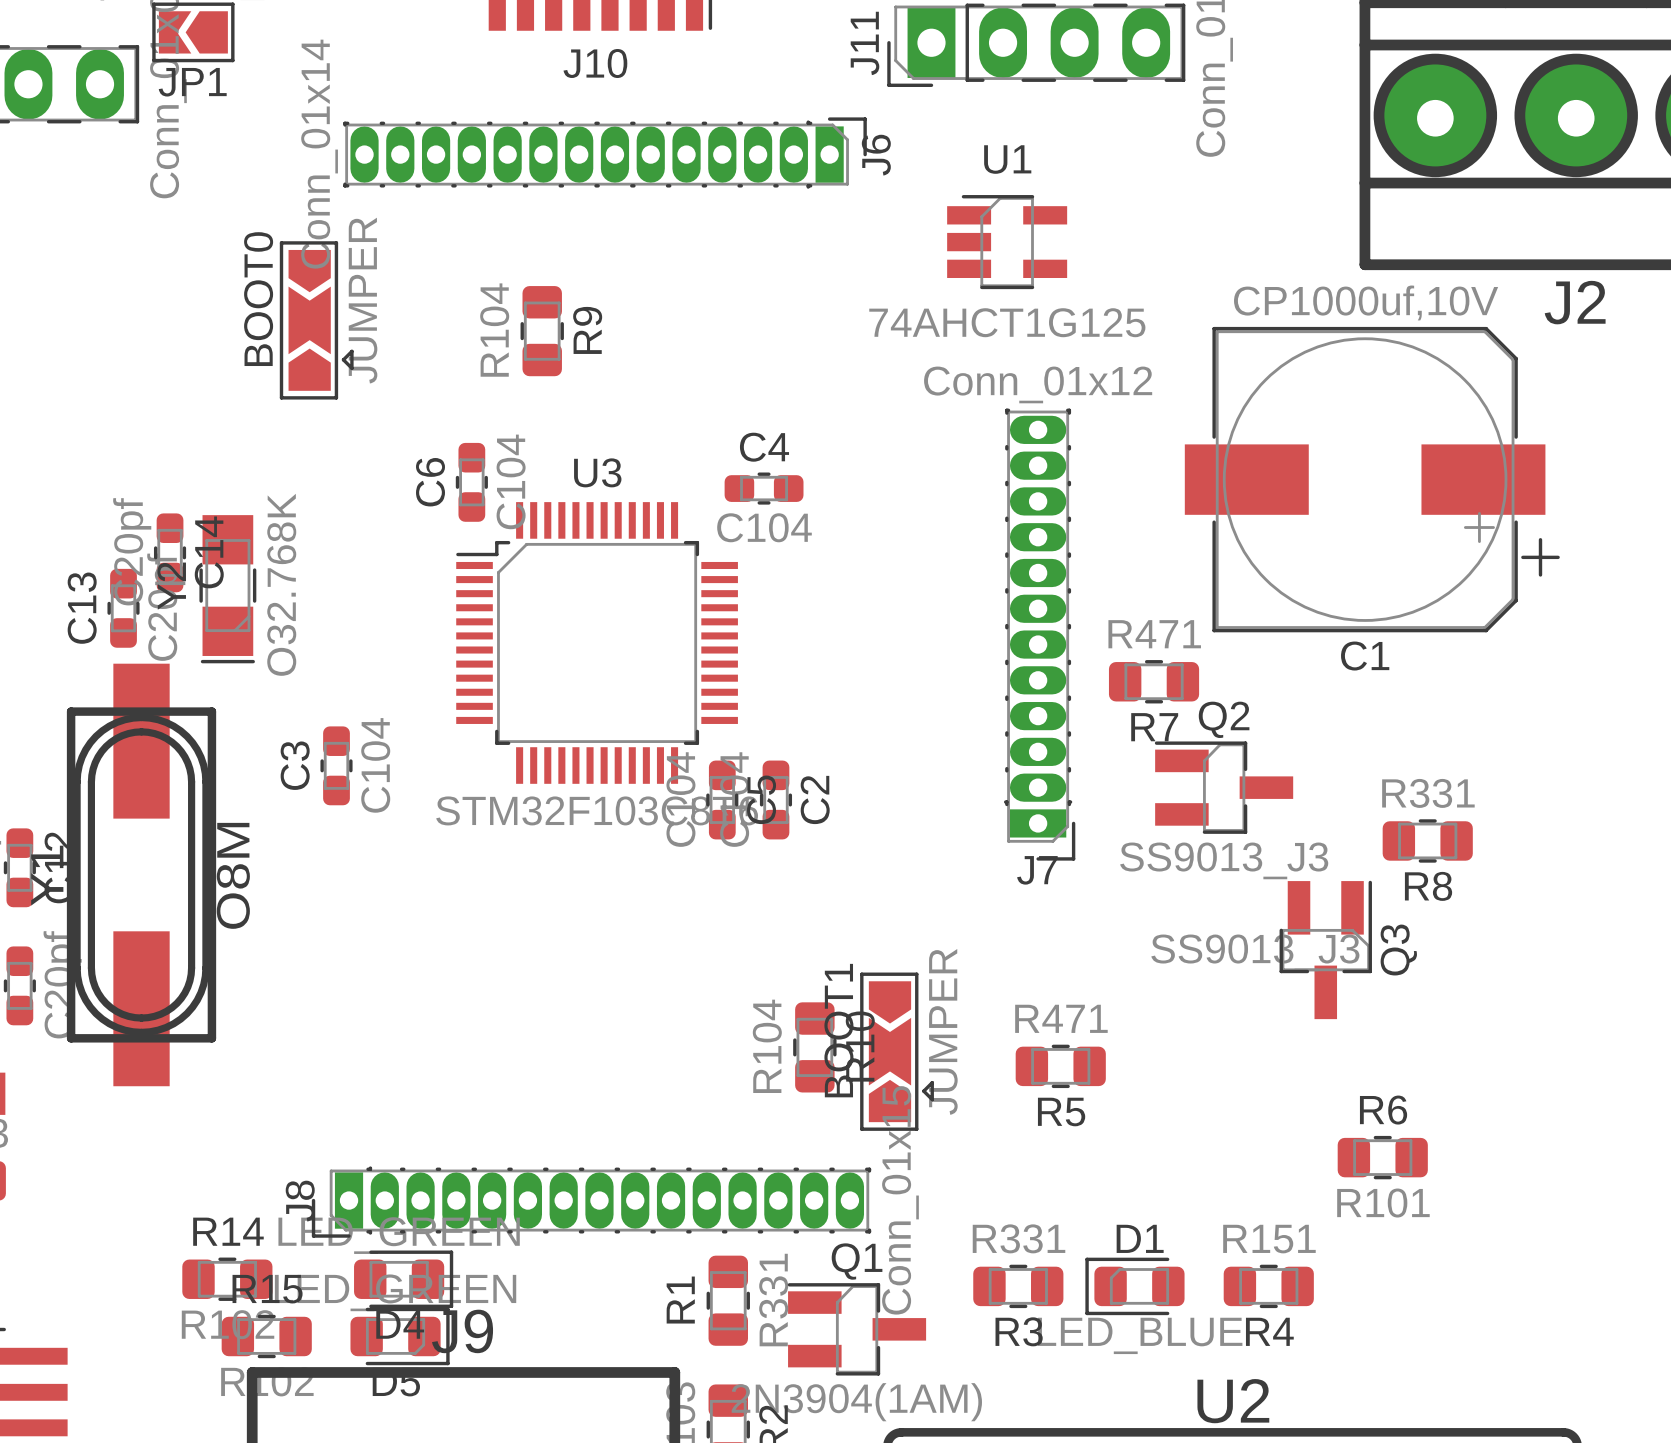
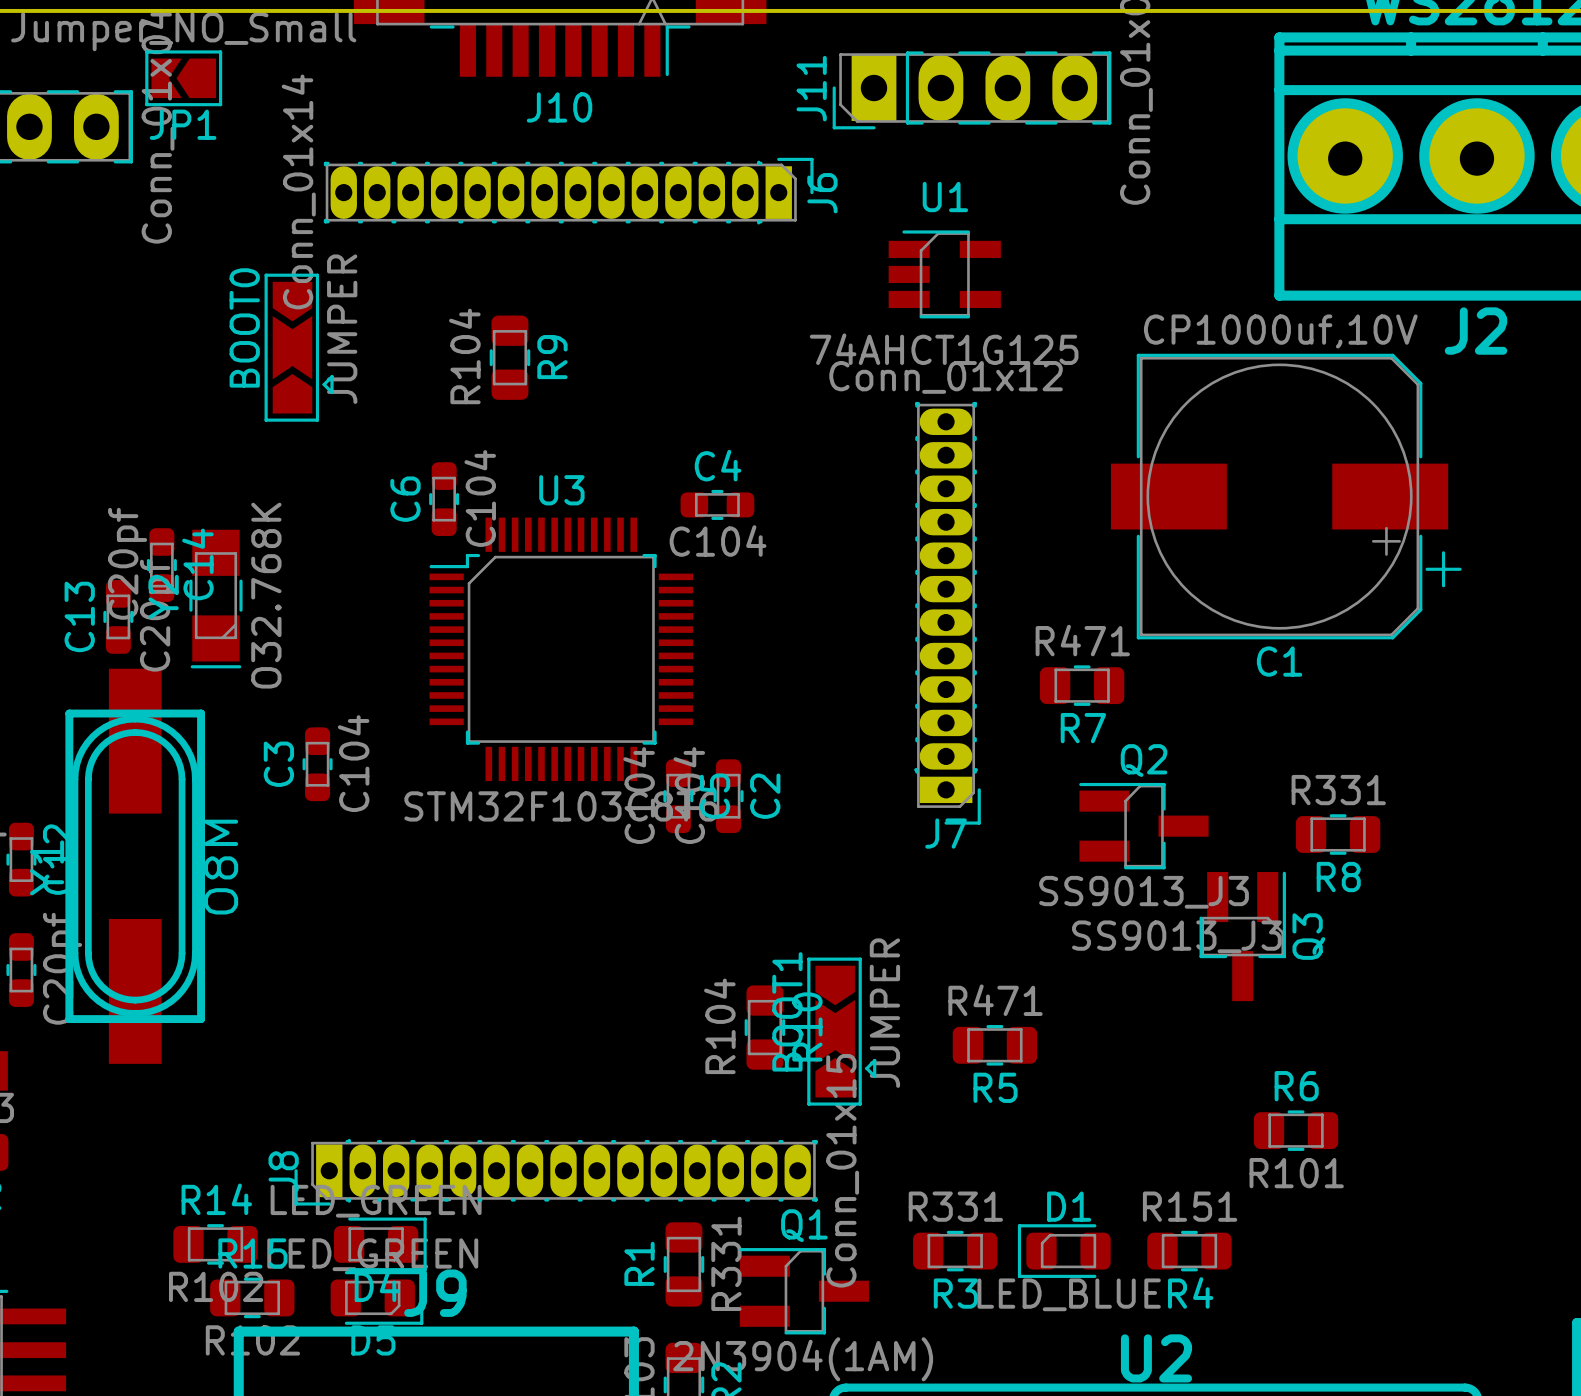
J7 position: (1039, 634) -> (947, 613)
Q2 position: (1224, 787) -> (1143, 826)

